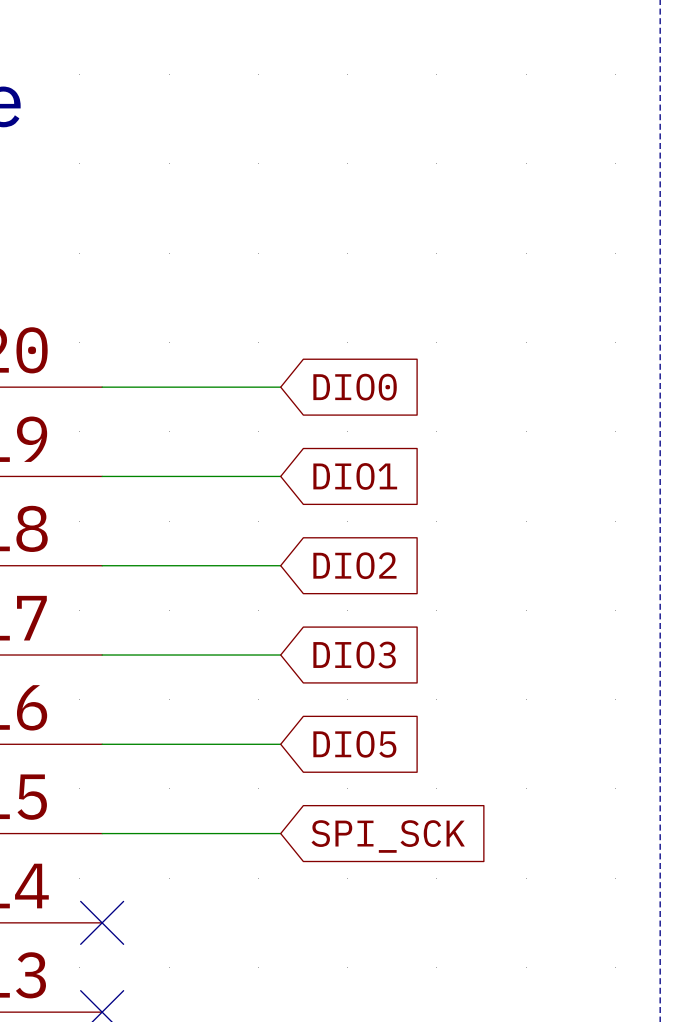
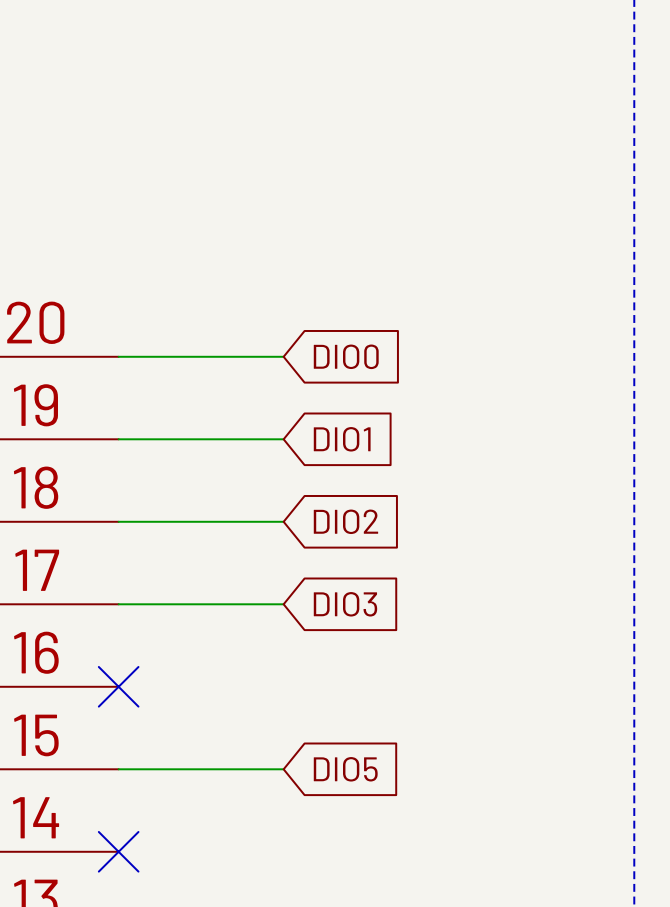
wire: (102, 744) (280, 744) -> none
no-connect mark: none -> (118, 686)
global label: DIO5 (354, 744) -> none
global label: SPI_SCK (388, 836) -> DIO5 (345, 769)

